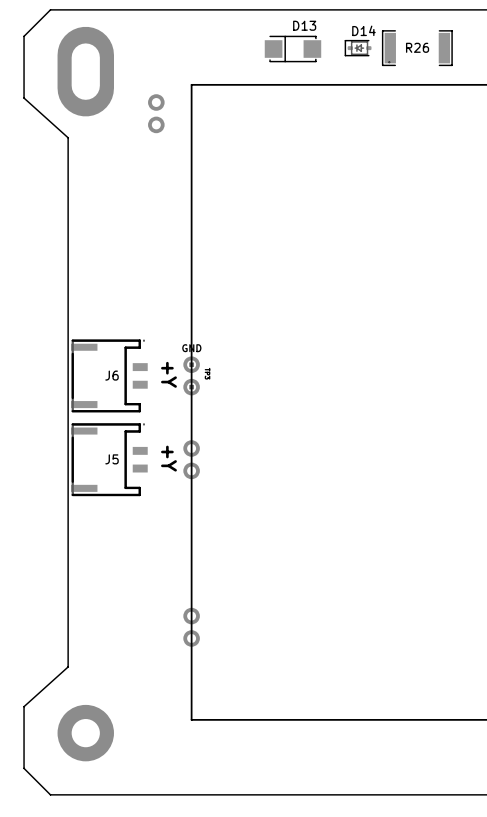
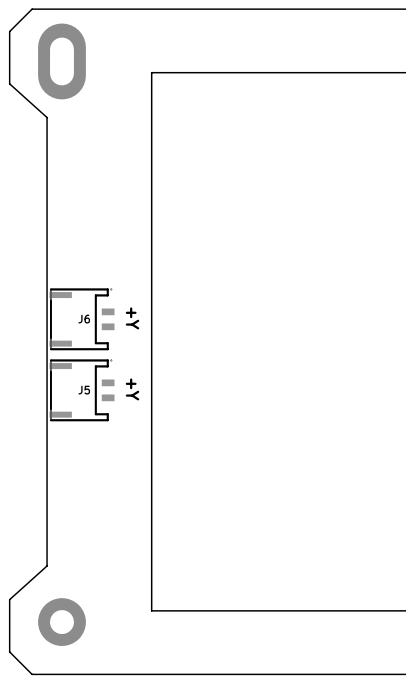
D14: (358, 48) -> none
R26: (417, 48) -> none
D13: (292, 49) -> none
part: (156, 113) -> none
part: (191, 375) -> none
part: (191, 459) -> none
part: (191, 627) -> none

